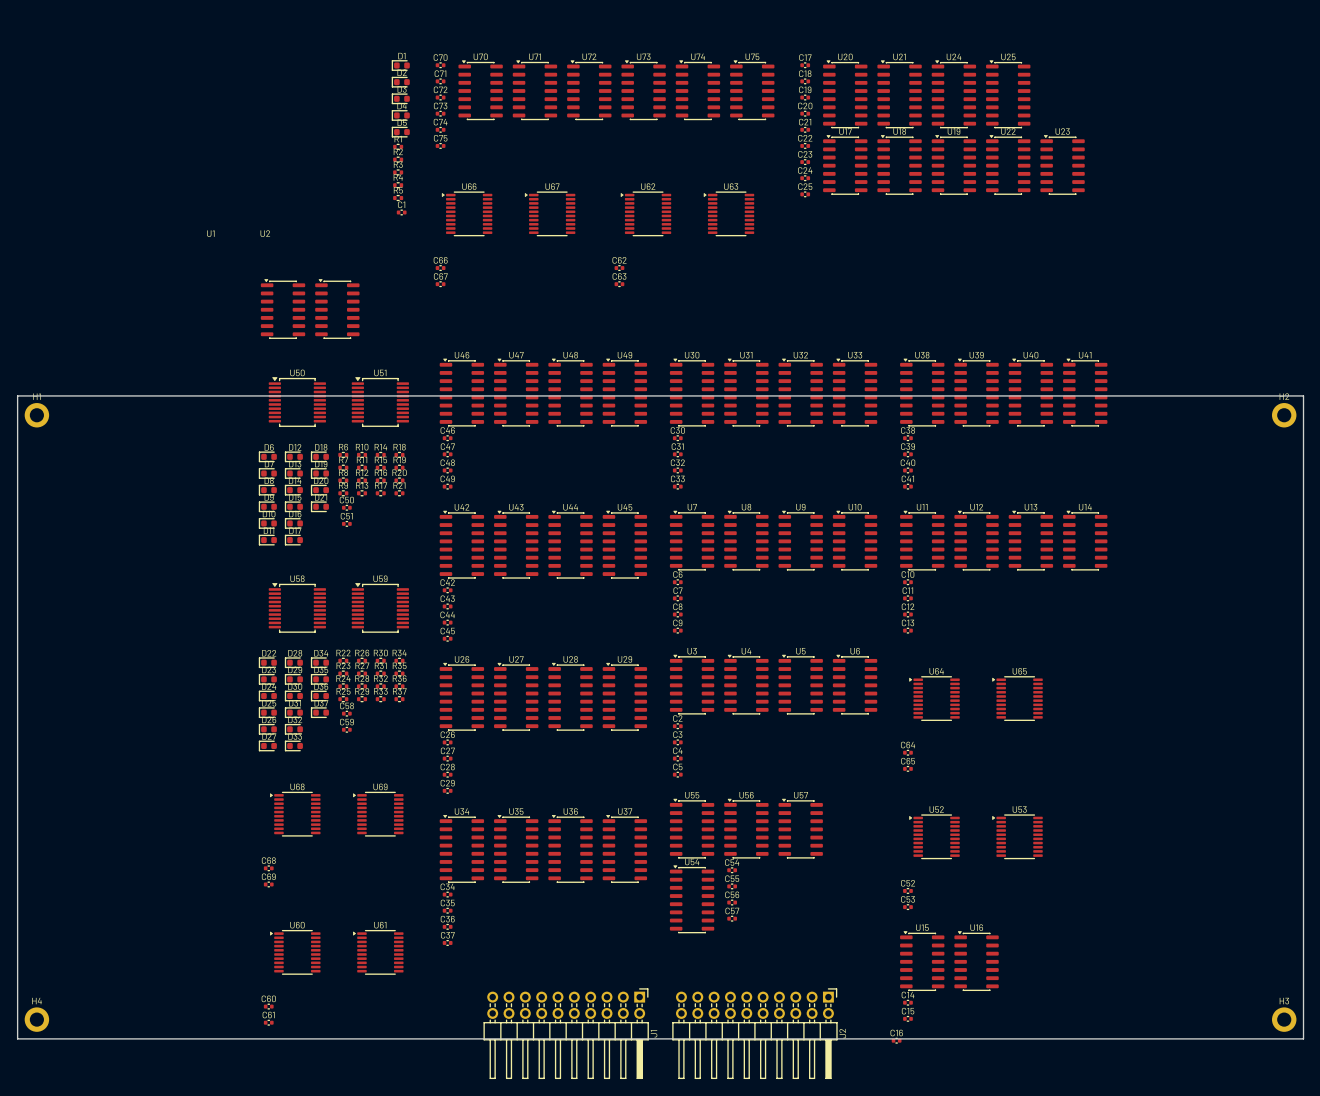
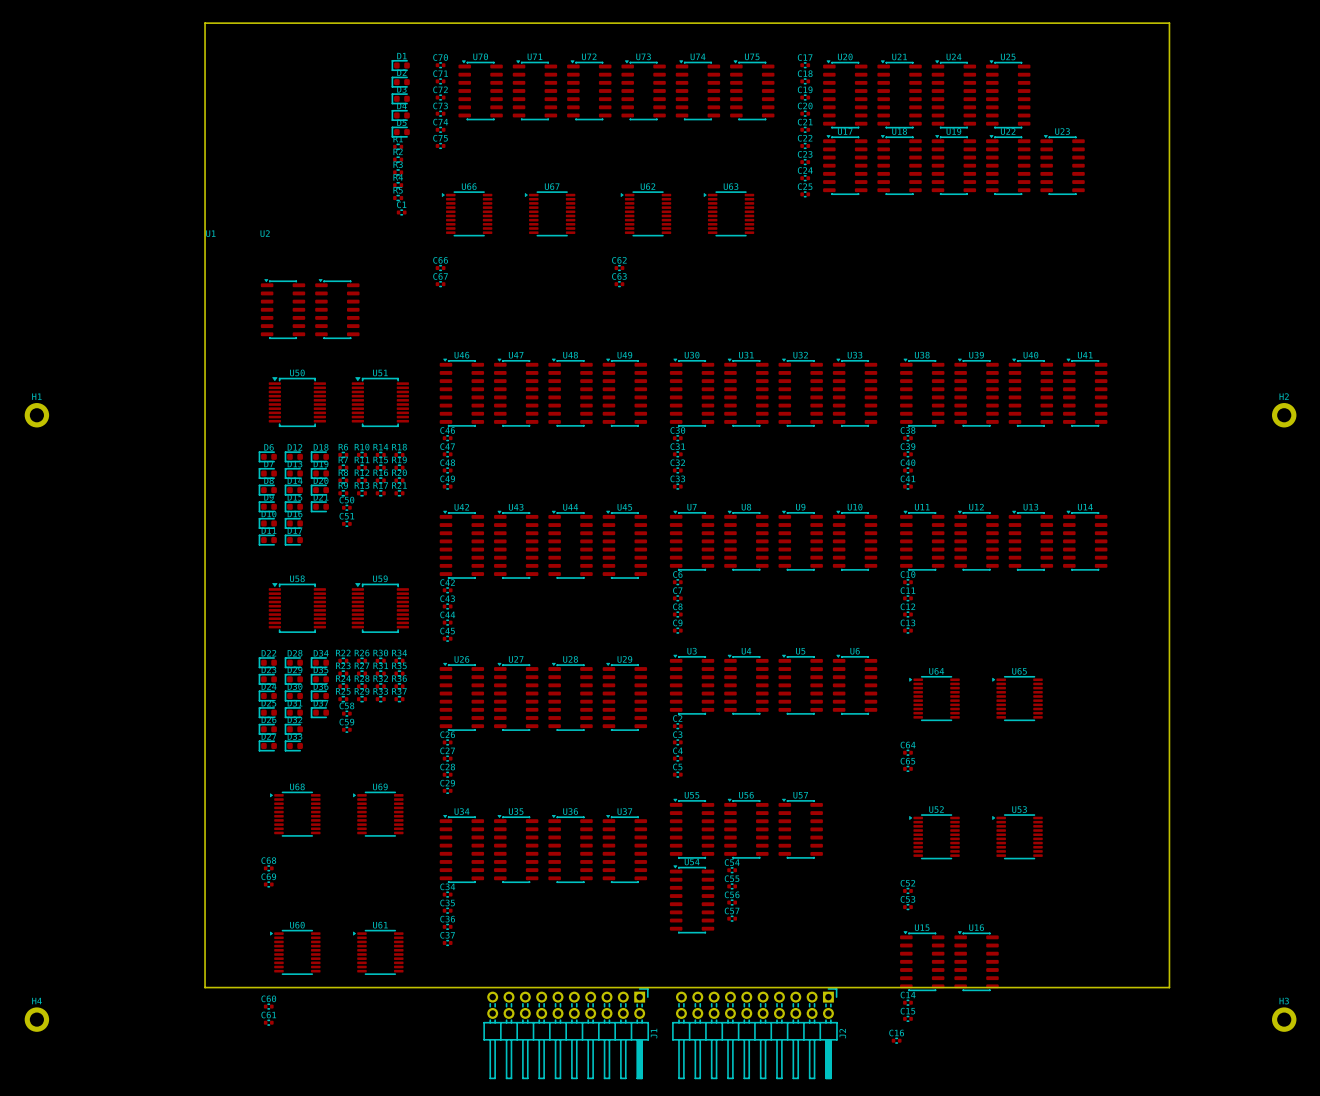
board edge: none -> (205, 23) (1169, 23) (1169, 987) (205, 987) (205, 23)
board edge: (17, 395) (1303, 395) (1303, 1038) (17, 1038) (17, 395) -> none

